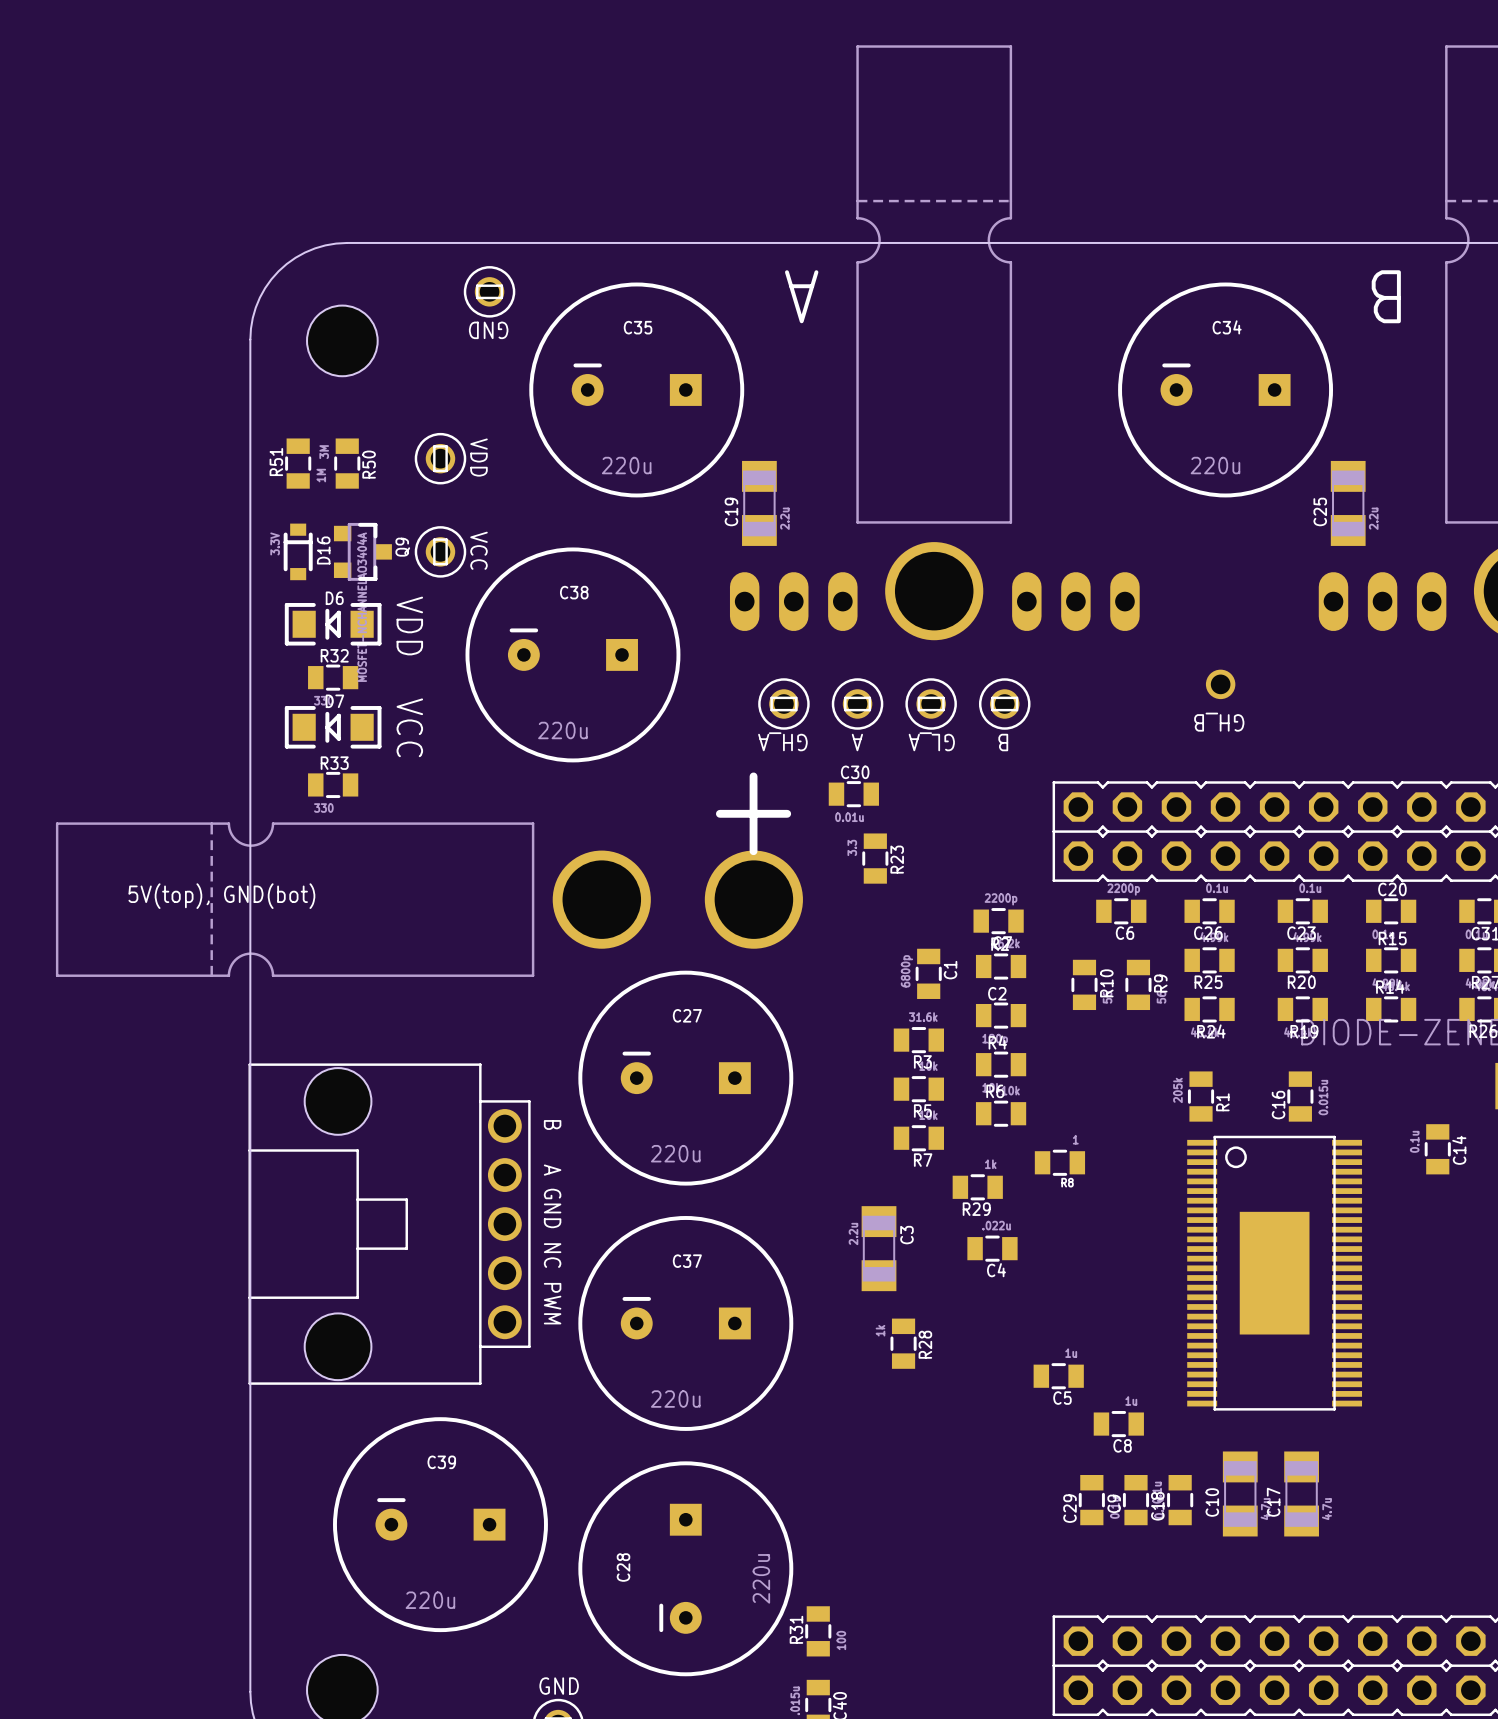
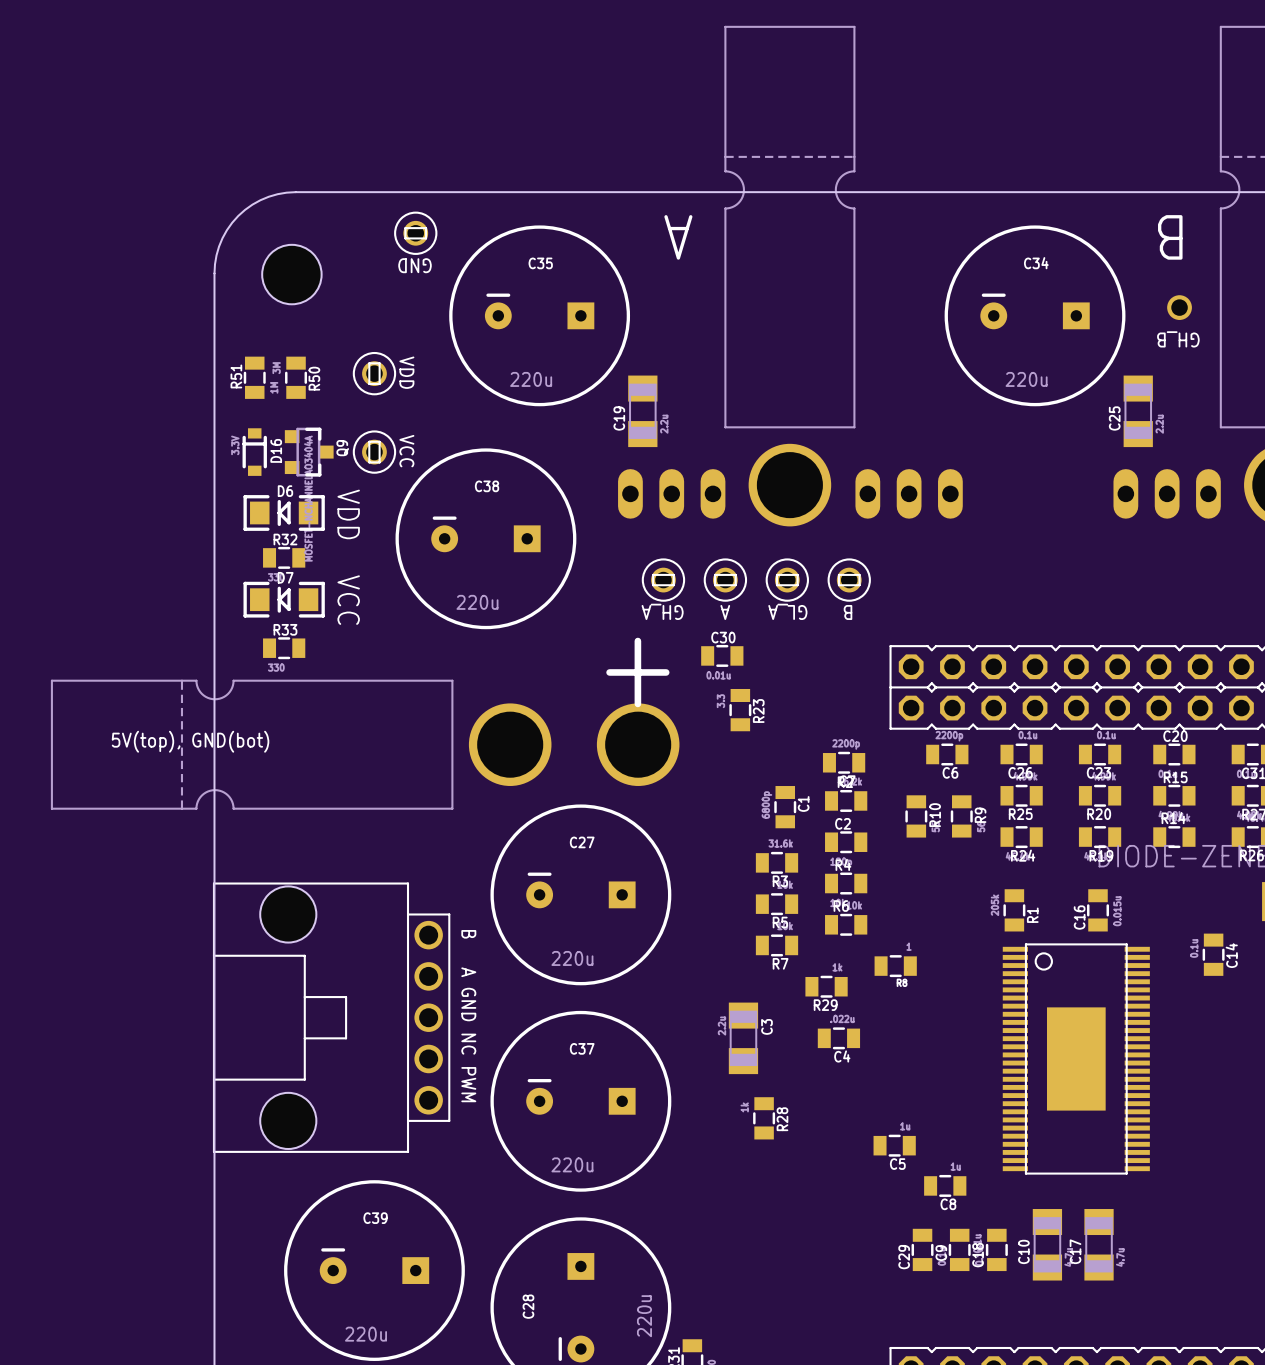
part position: (1220, 684) -> (1179, 307)
text position: GH_B (1219, 722) -> GH_B (1178, 339)

